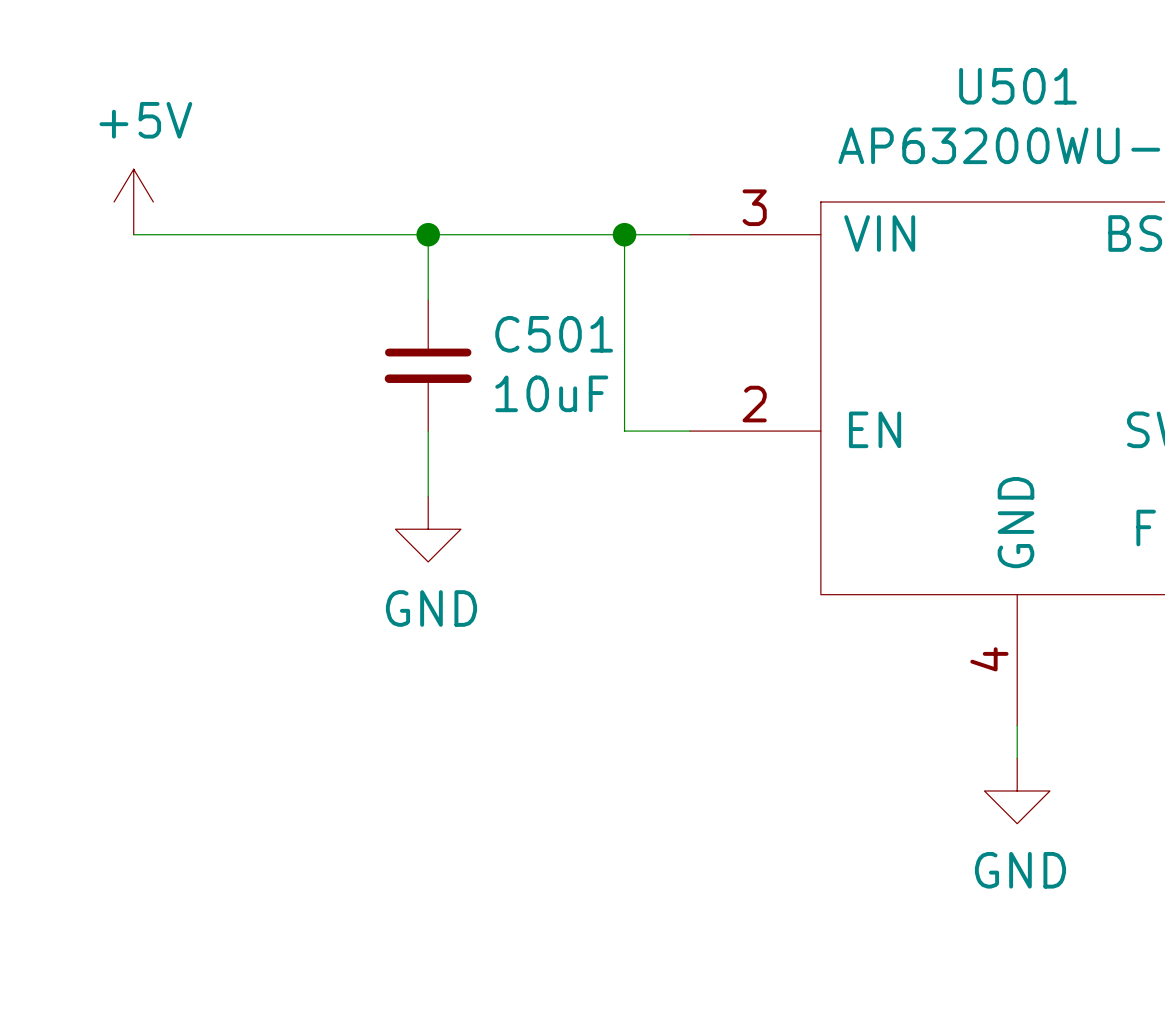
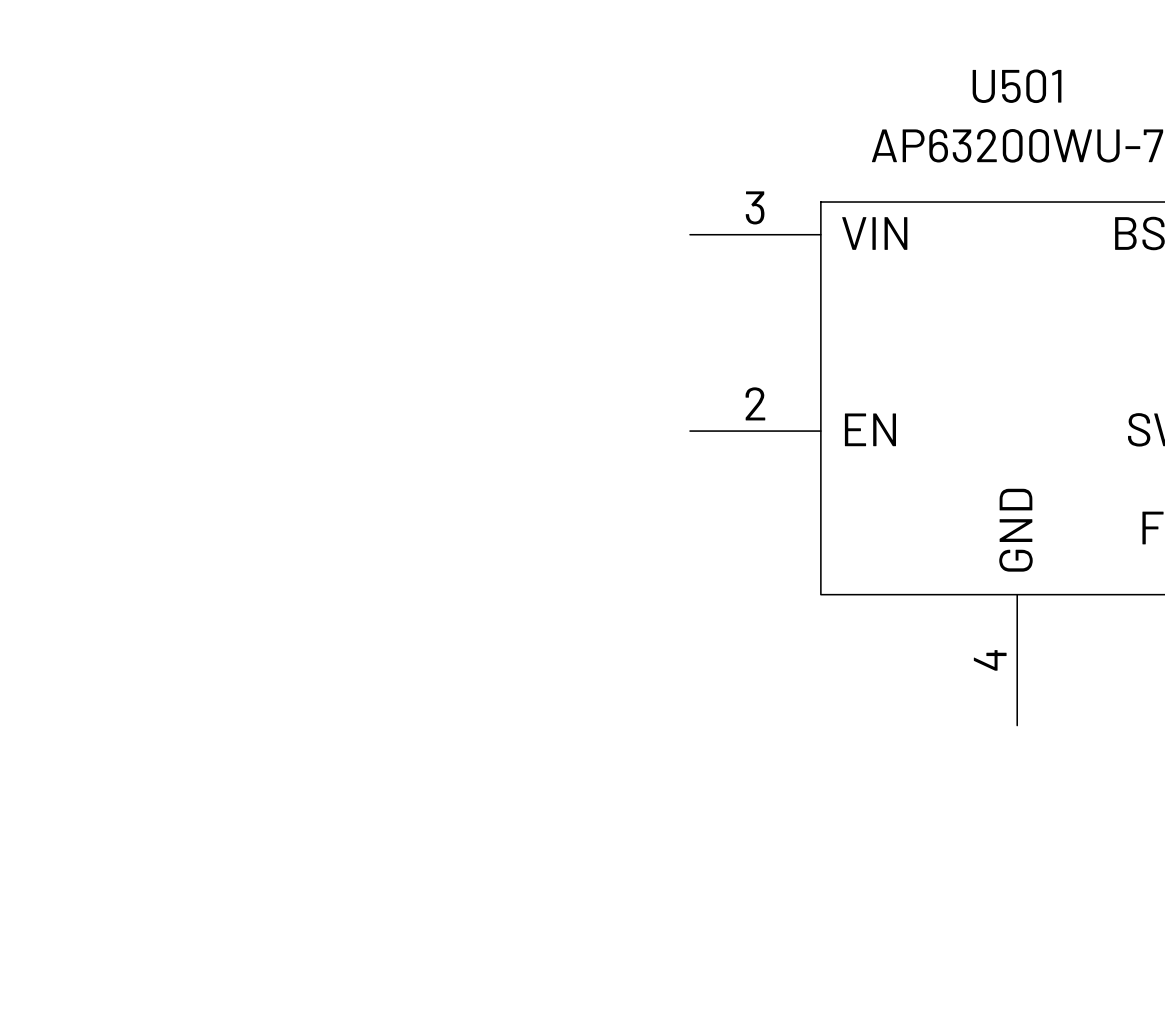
power symbol: +5V (133, 202) -> none
wire: (133, 234) (689, 234) -> none
wire: (428, 234) (428, 300) -> none
junction: (428, 234) -> none
wire: (624, 234) (624, 431) (689, 431) -> none
junction: (624, 234) -> none
C501: 10uF (428, 365) -> none
wire: (428, 431) (428, 496) -> none
power symbol: GND (428, 529) -> none
wire: (1017, 725) (1017, 758) -> none
power symbol: GND (1017, 790) -> none

